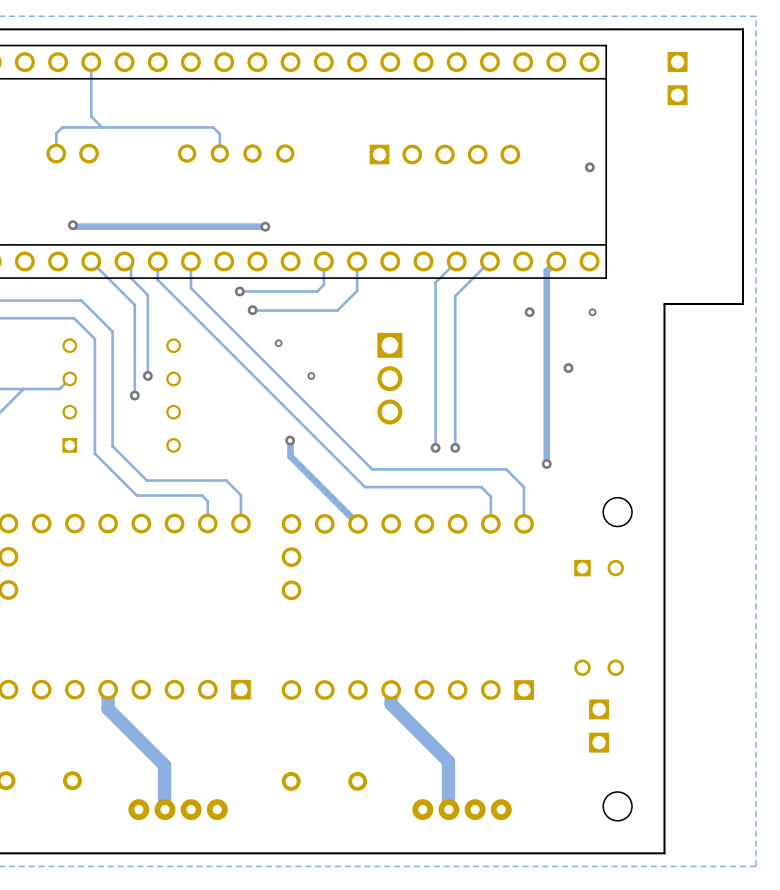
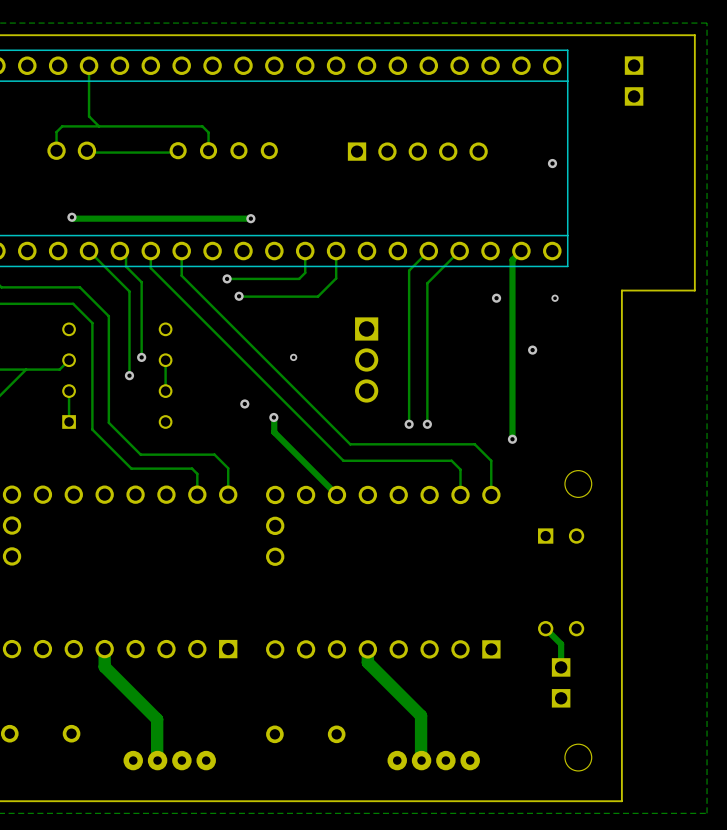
track: none -> (176, 152) (86, 152)
via: (278, 343) -> none
track: none -> (165, 360) (165, 391)
track: none -> (69, 391) (69, 421)
via: none -> (244, 403)
track: none -> (545, 628) (561, 644) (561, 667)

